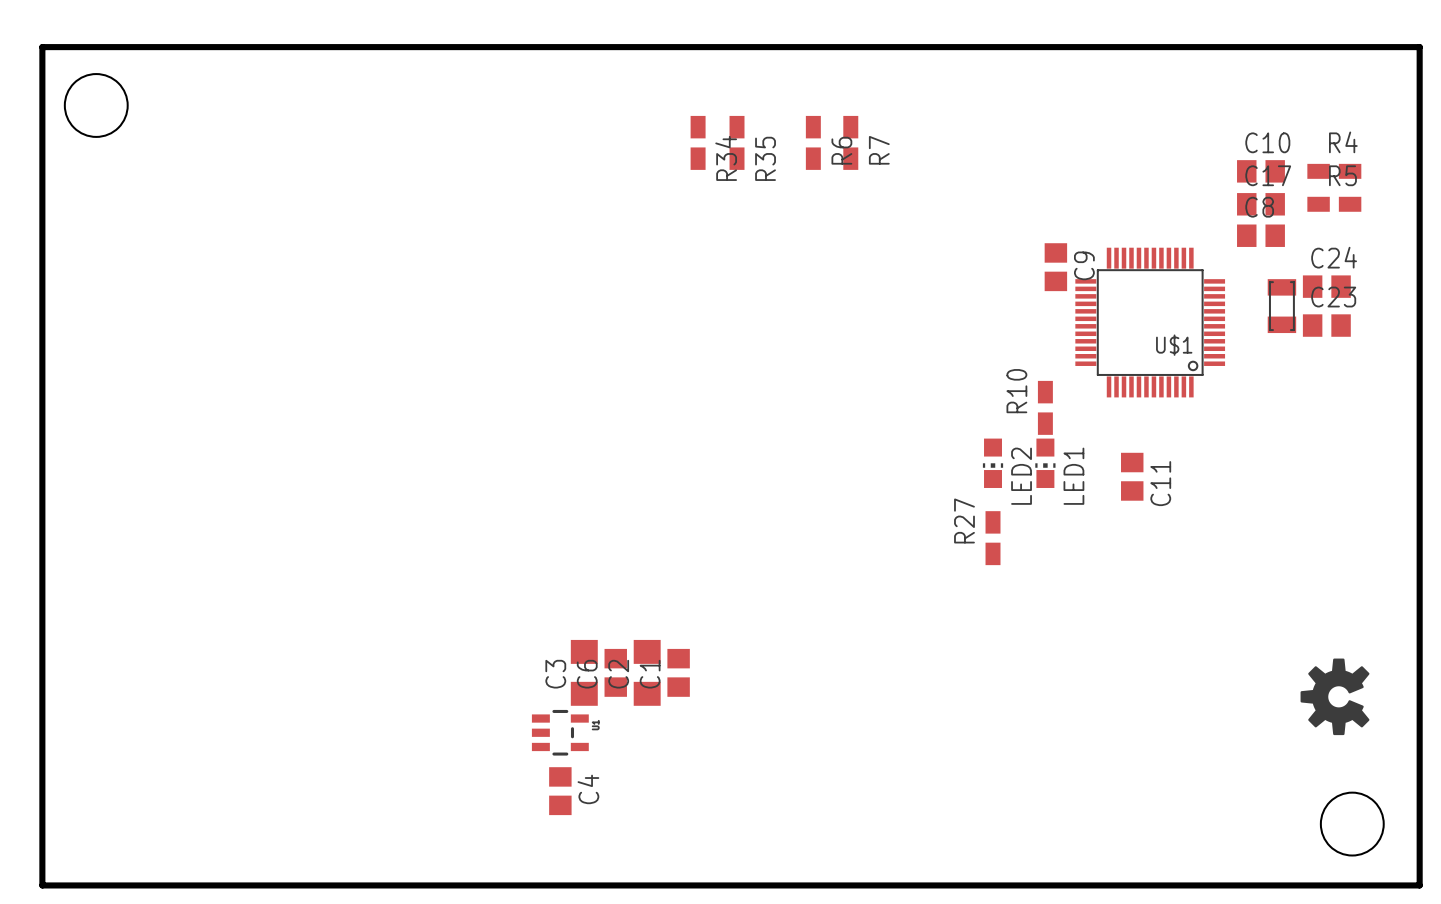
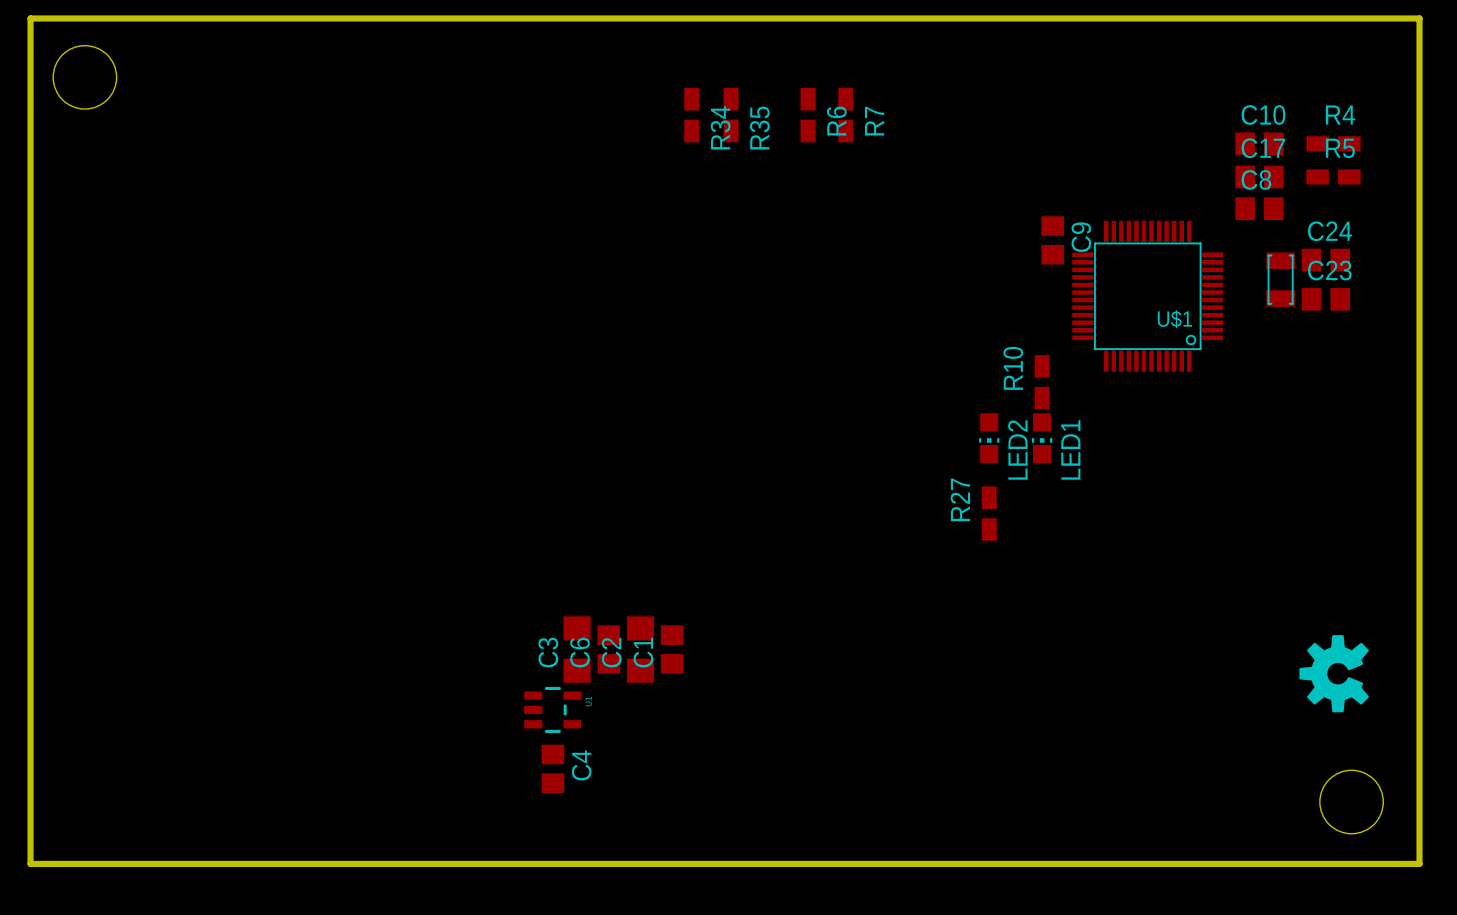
C11: (1132, 476) -> none

